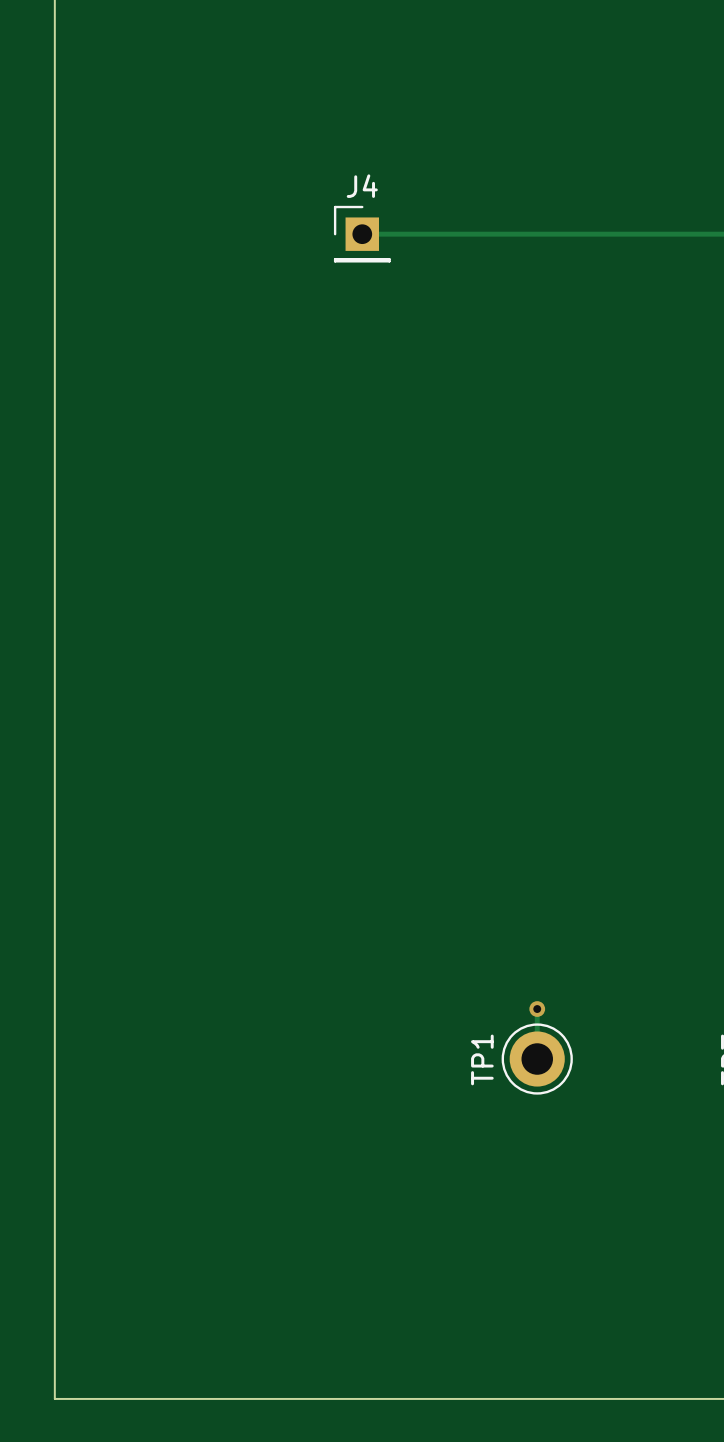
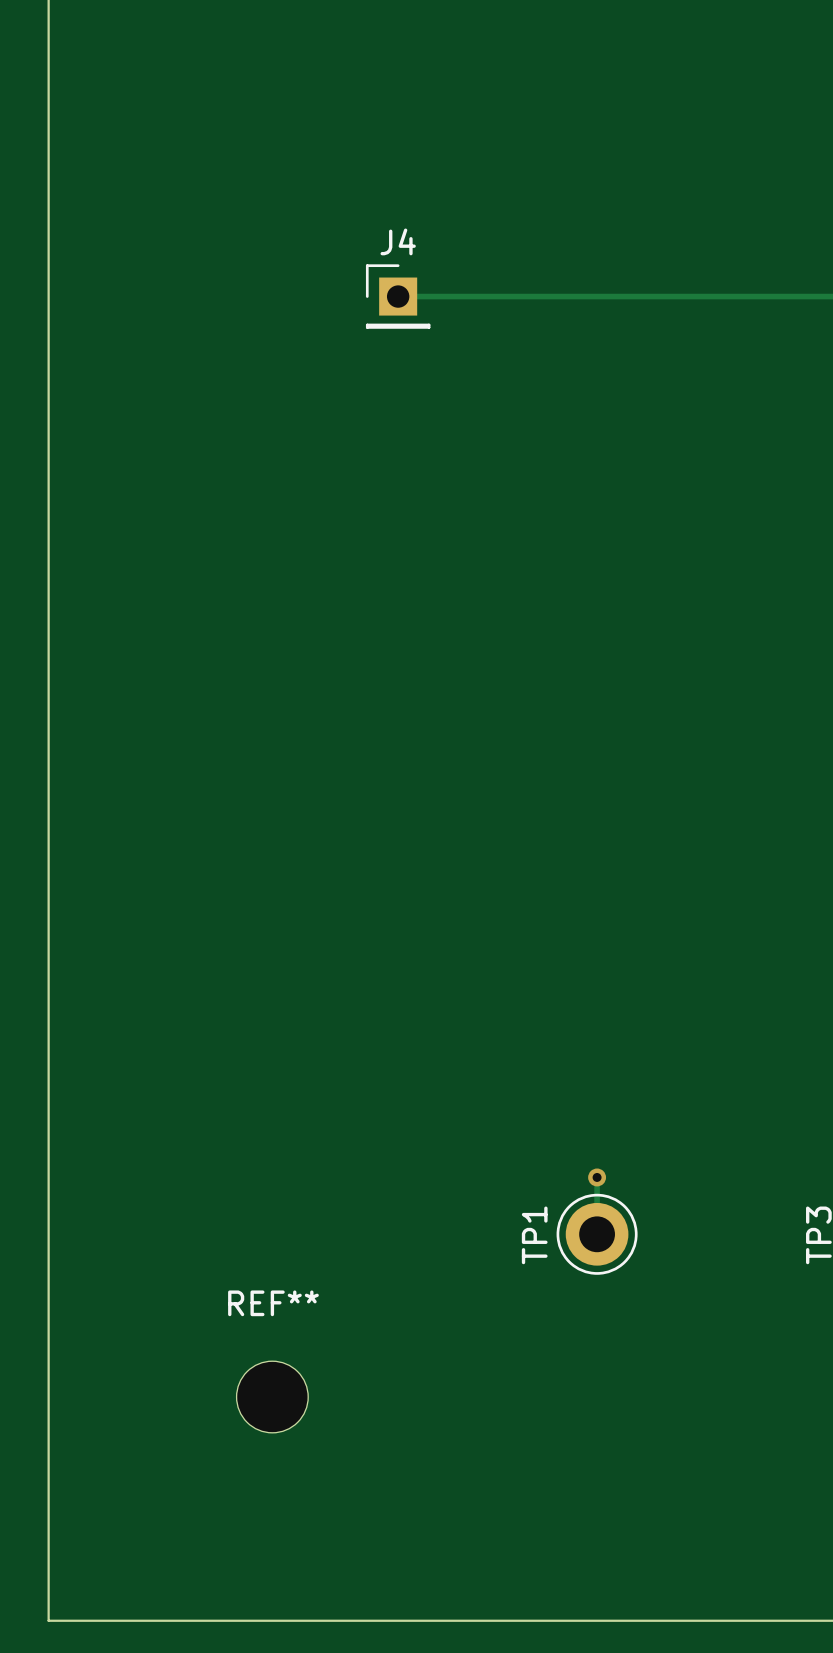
REF**: none -> (272, 1397)

